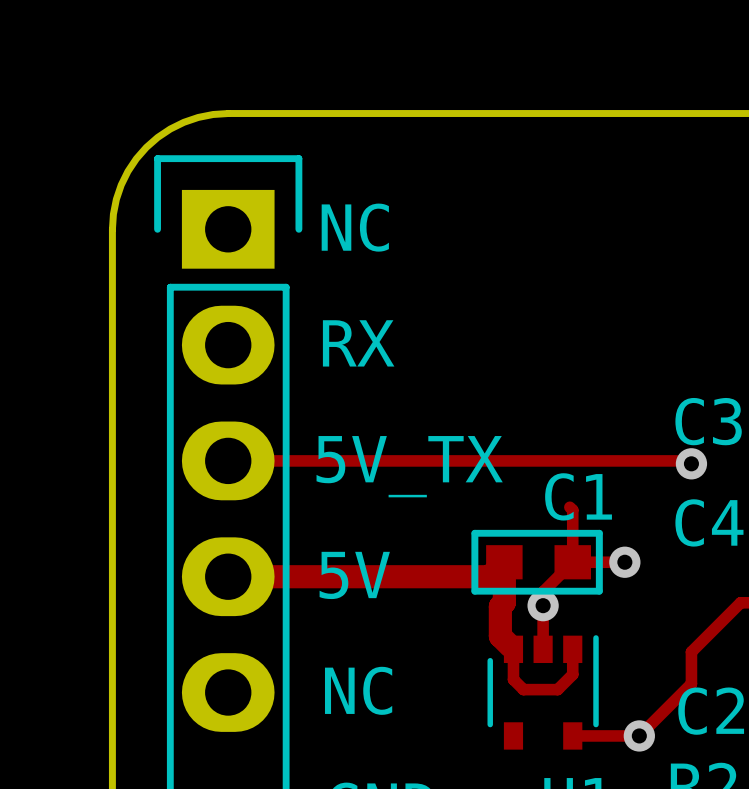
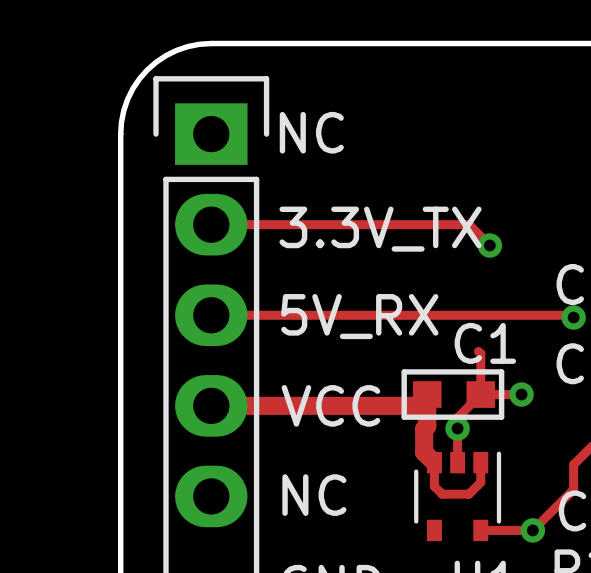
text: RX (358, 343) -> none
track: none -> (211, 224) (469, 224) (489, 245)
text: none -> 3.3V_TX (380, 229)
via: none -> (489, 245)
text: 5V_TX (409, 466) -> 5V_RX (359, 316)
text: 5V (354, 575) -> VCC (330, 405)

